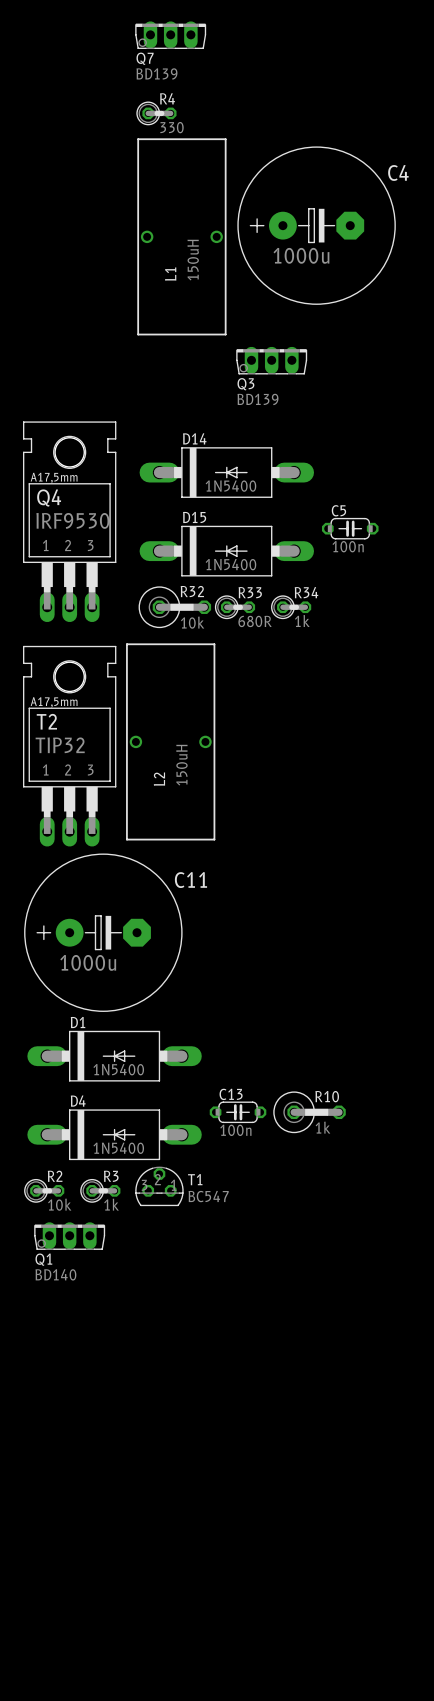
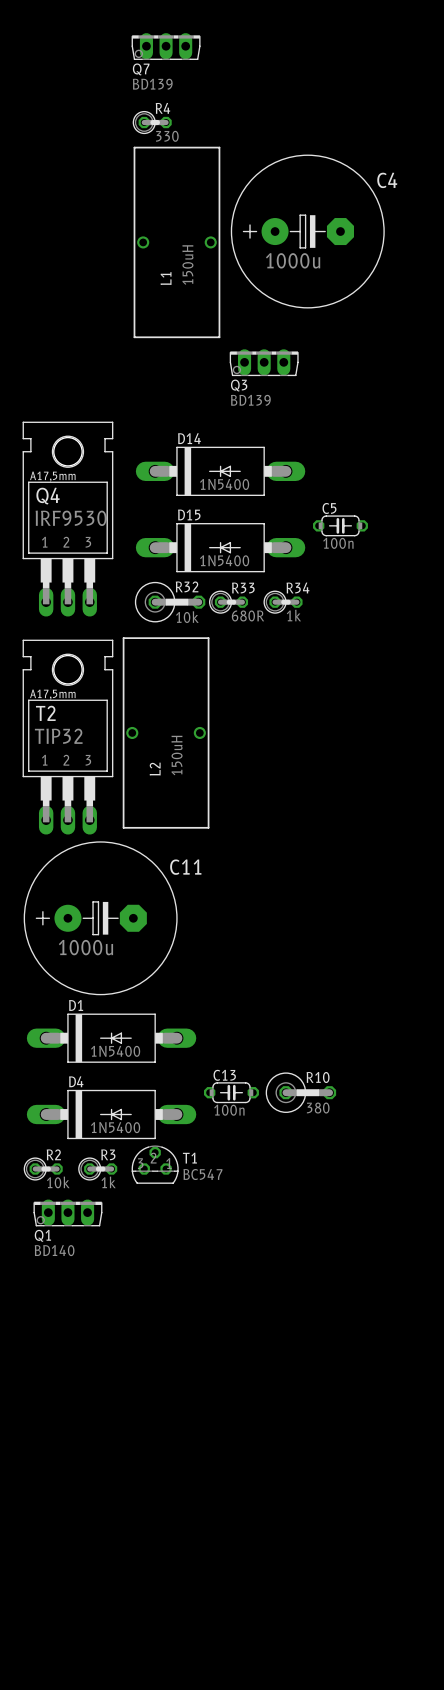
R10 value: 1k (322, 1127) -> 380 (318, 1108)

